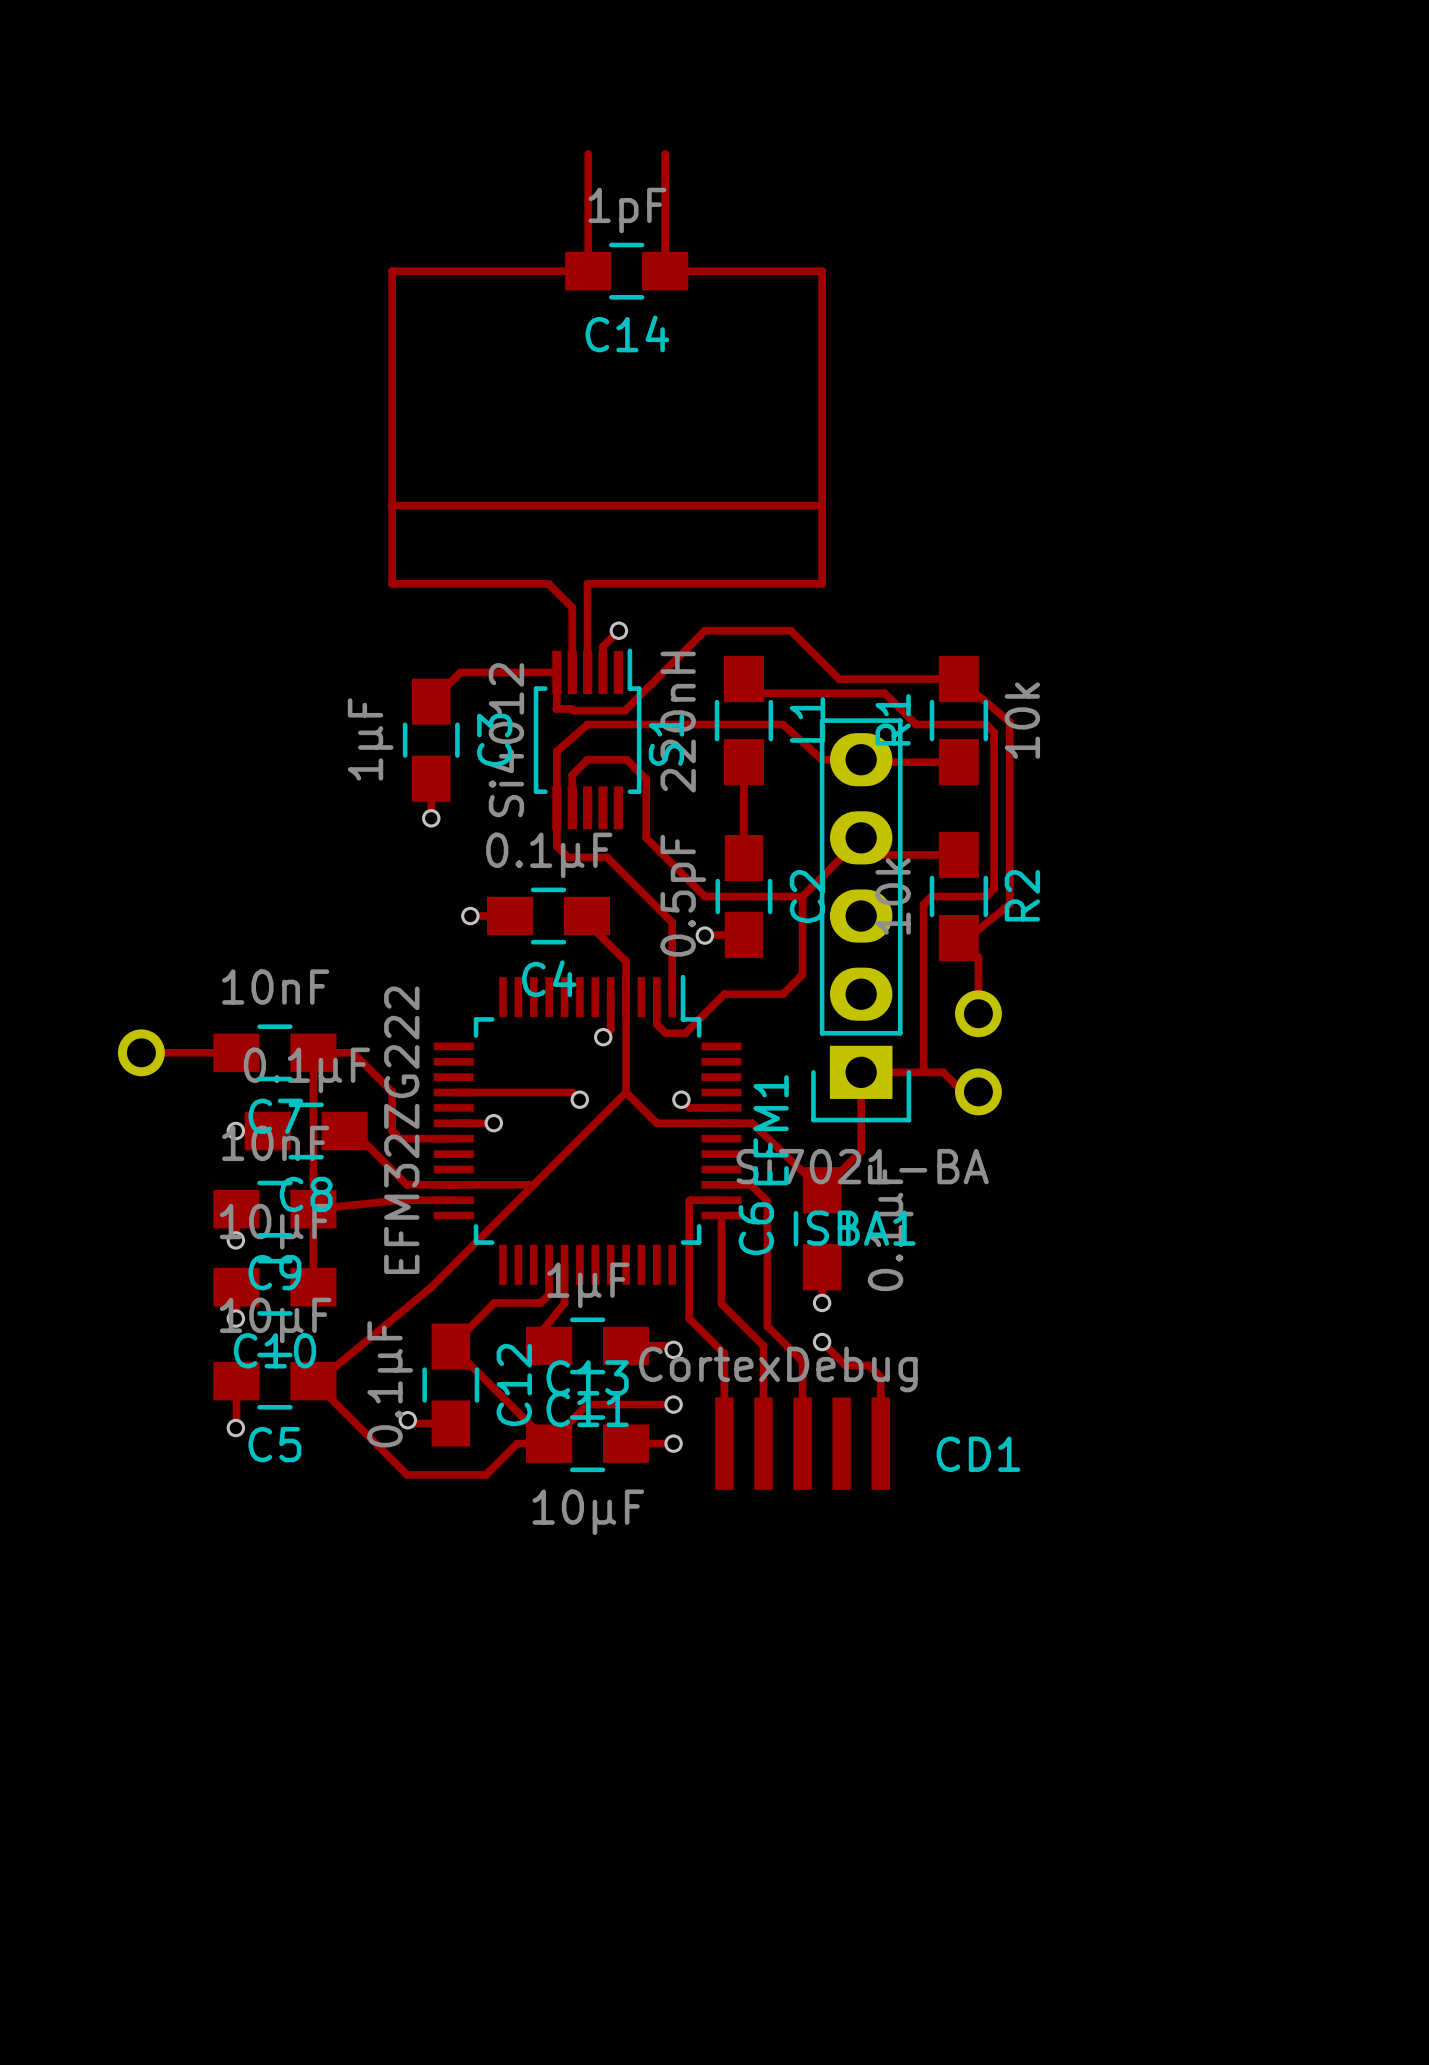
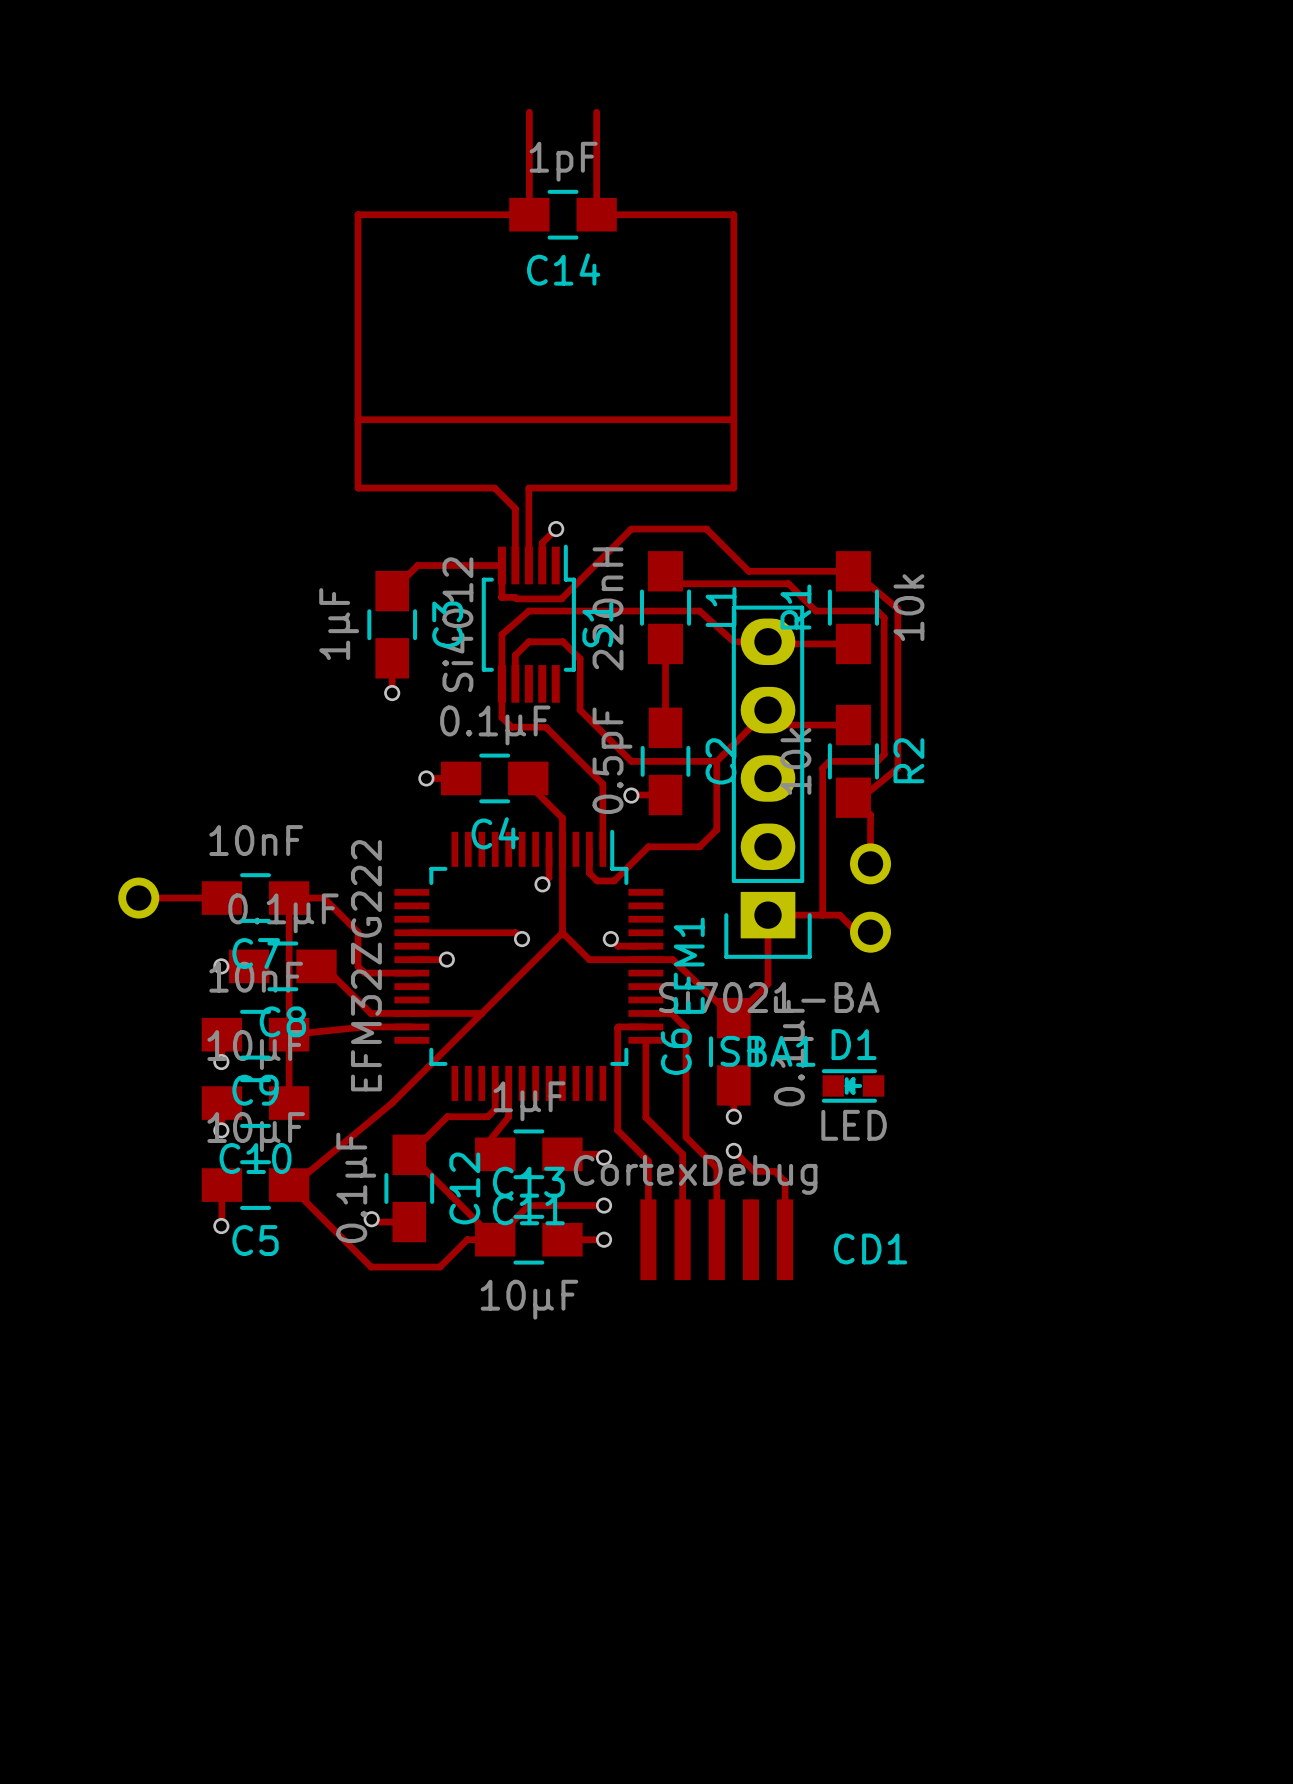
D1: none -> LED (853, 1085)

